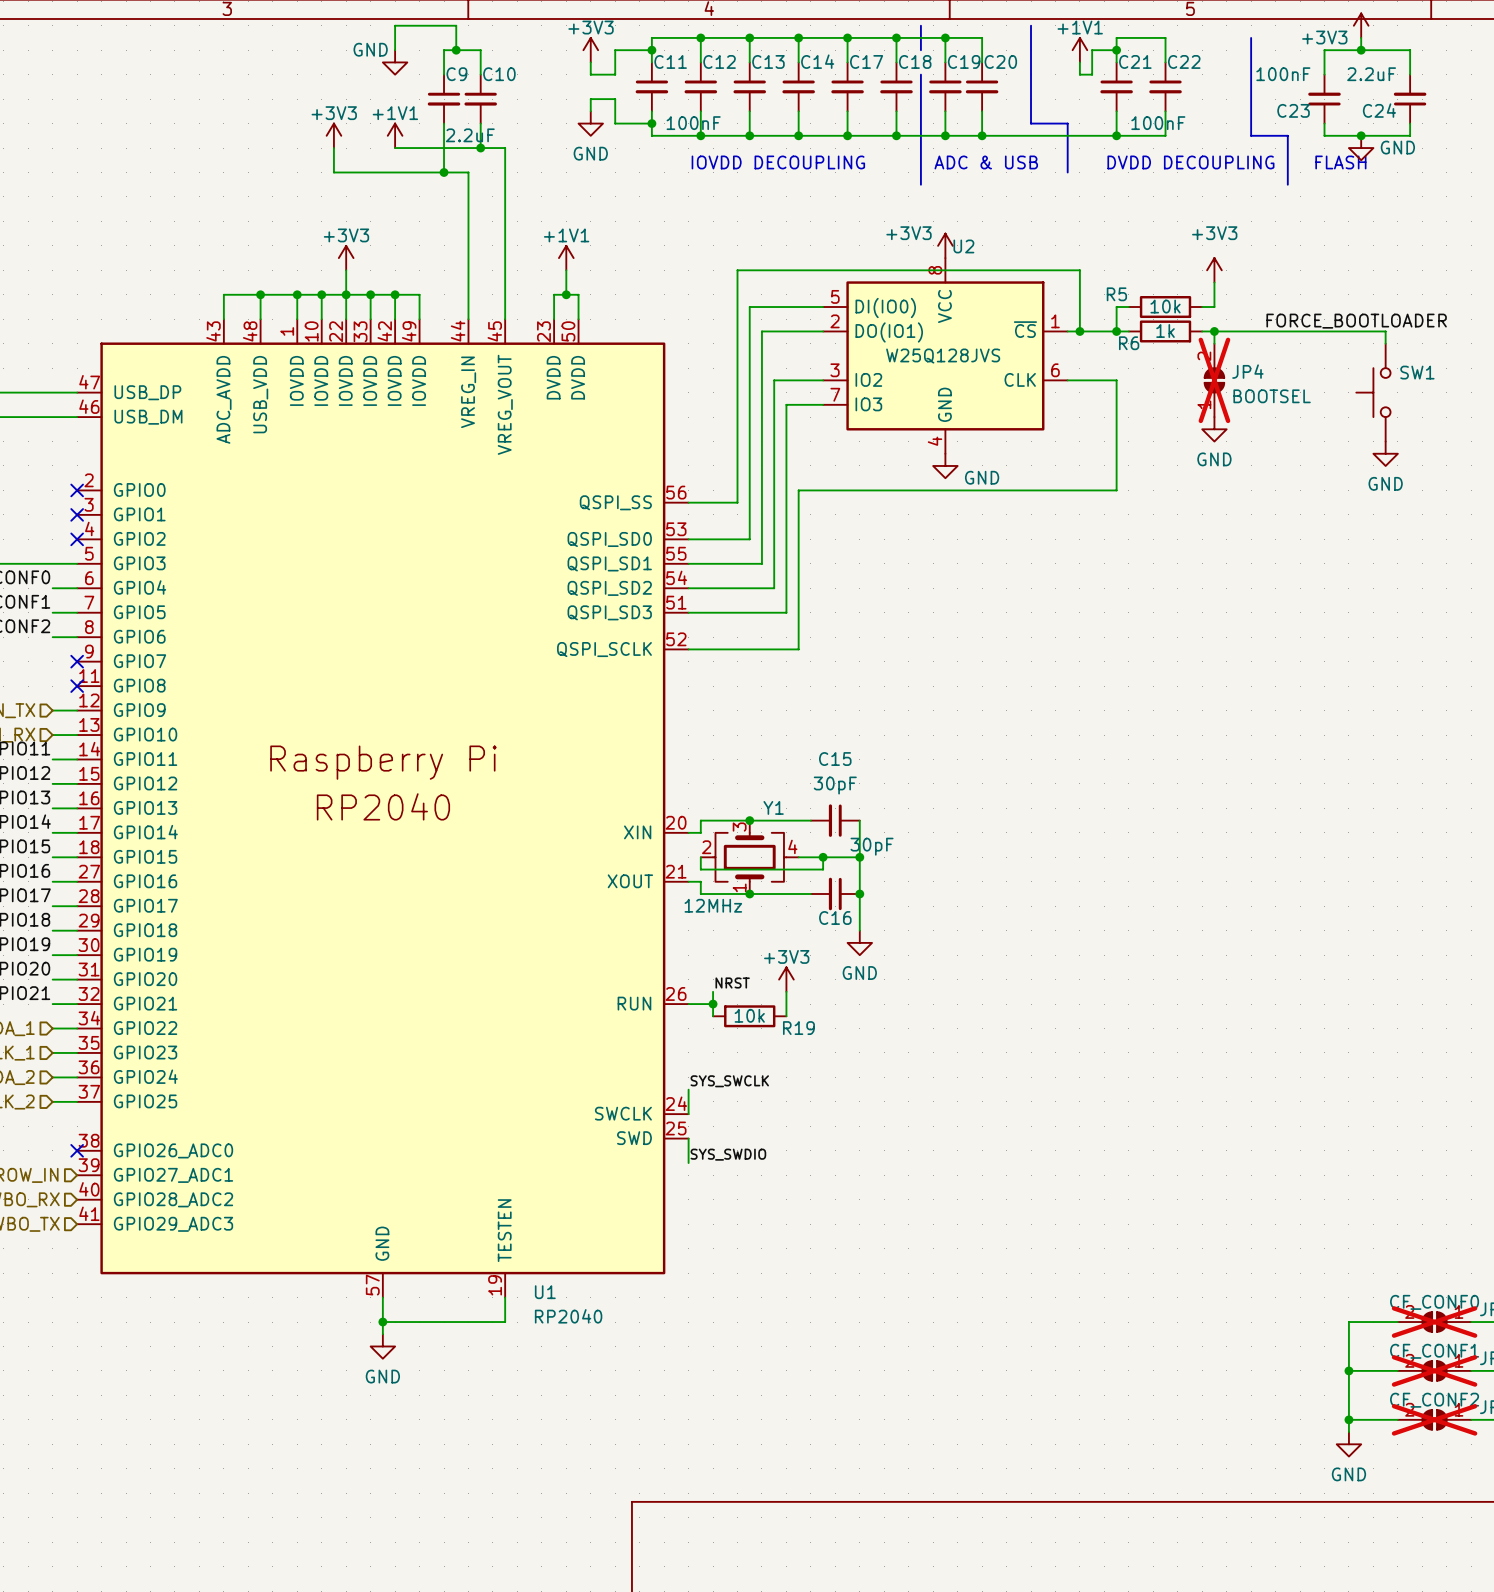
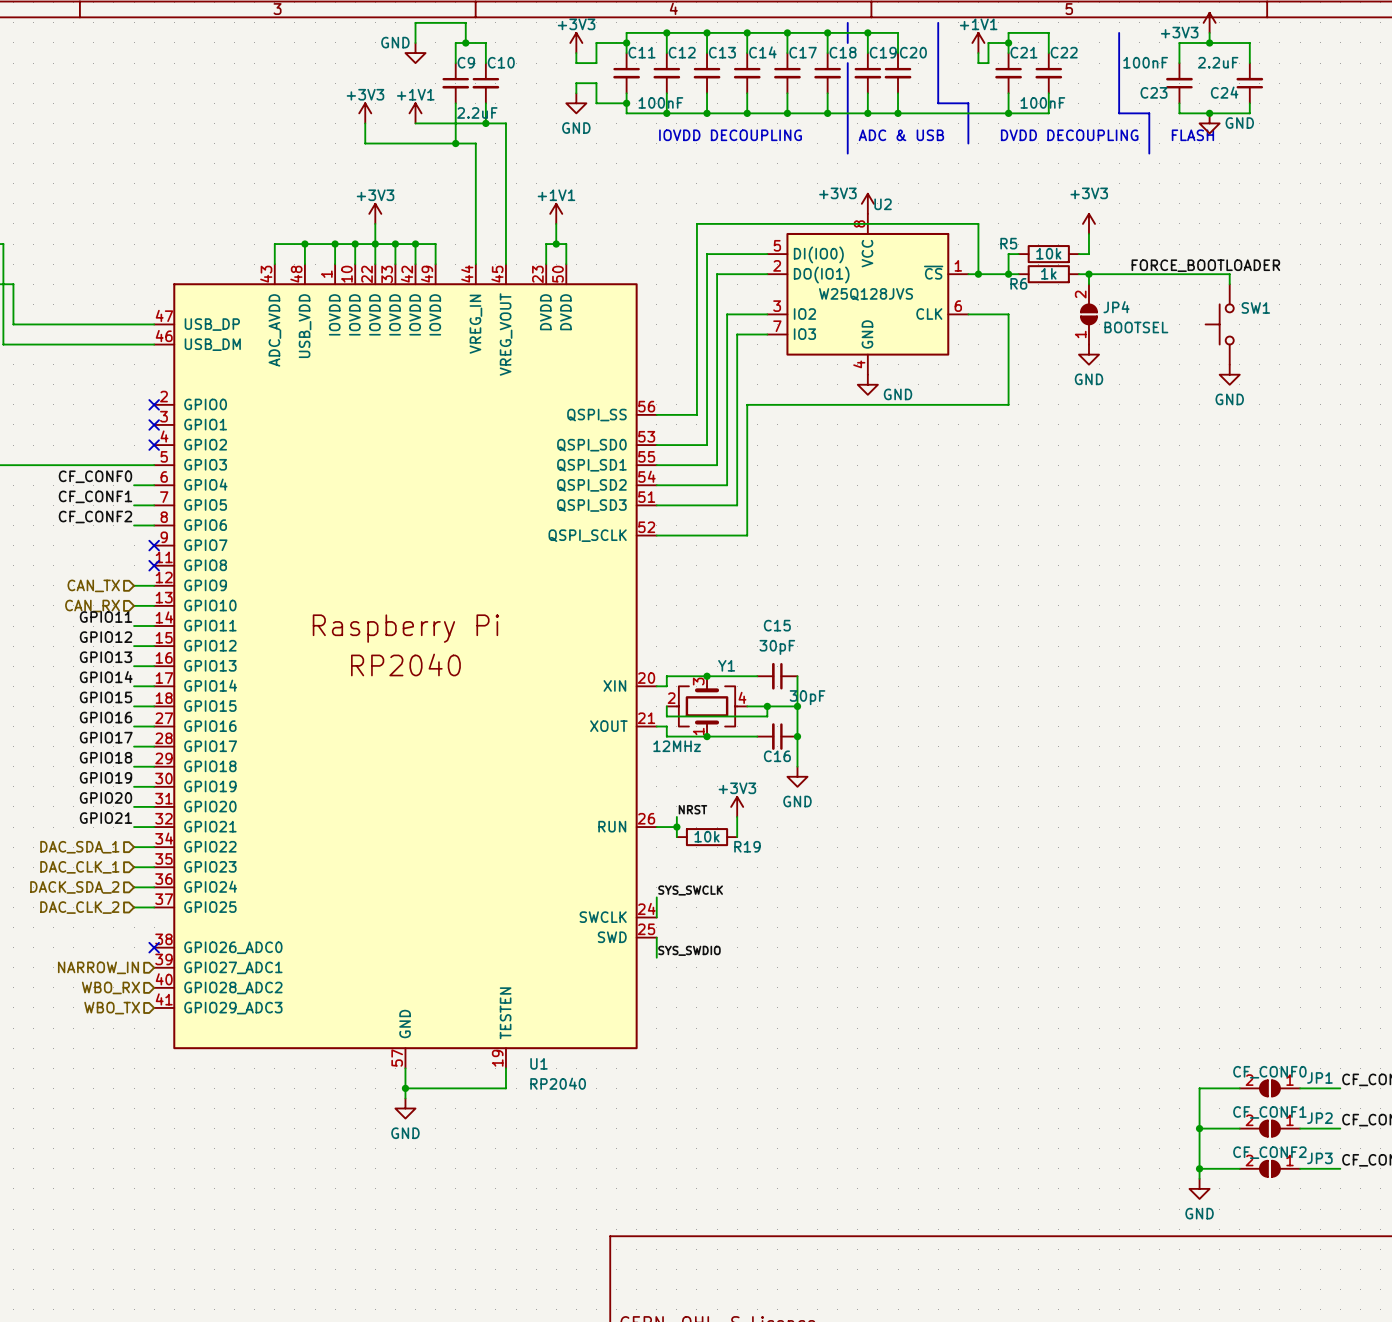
JP4 do-not-place cross: (1214, 380) -> none
JP1 do-not-place cross: (1434, 1322) -> none
JP2 do-not-place cross: (1434, 1370) -> none
JP3 do-not-place cross: (1434, 1419) -> none

